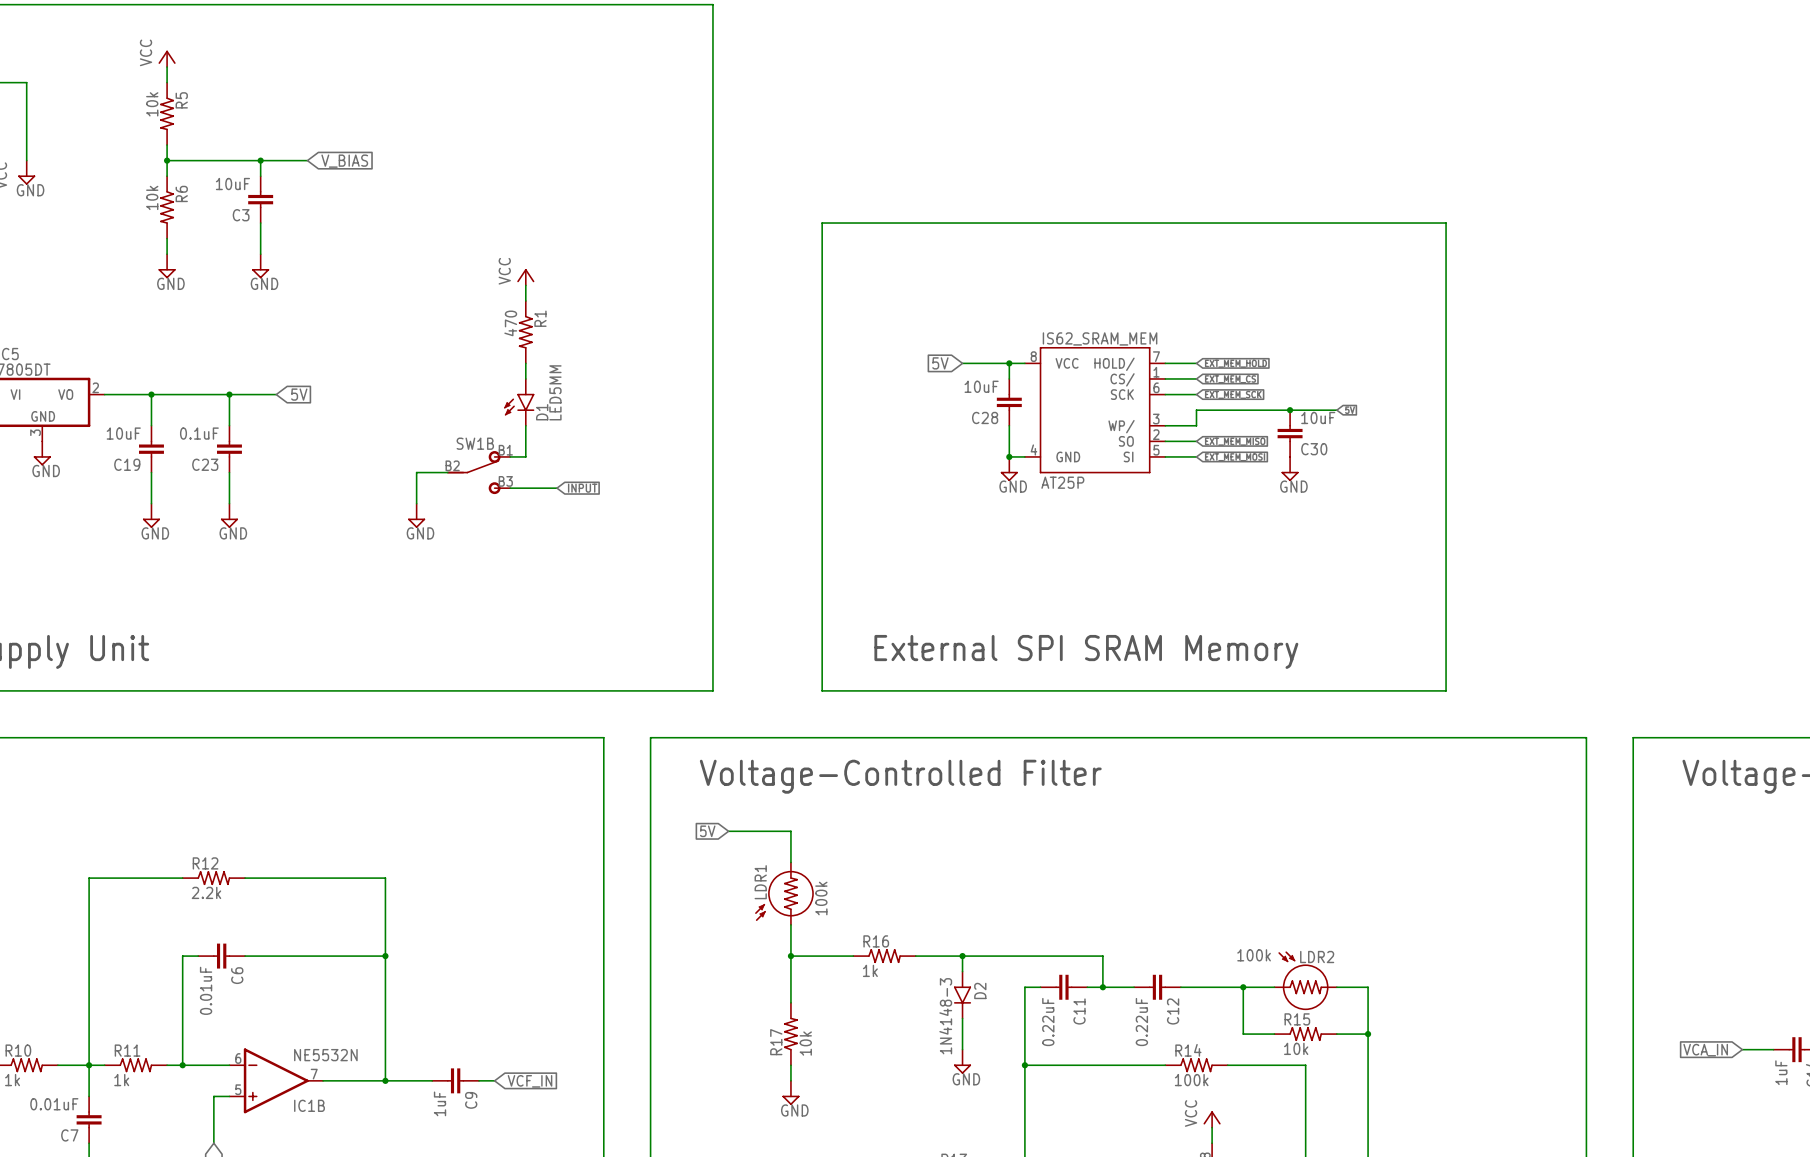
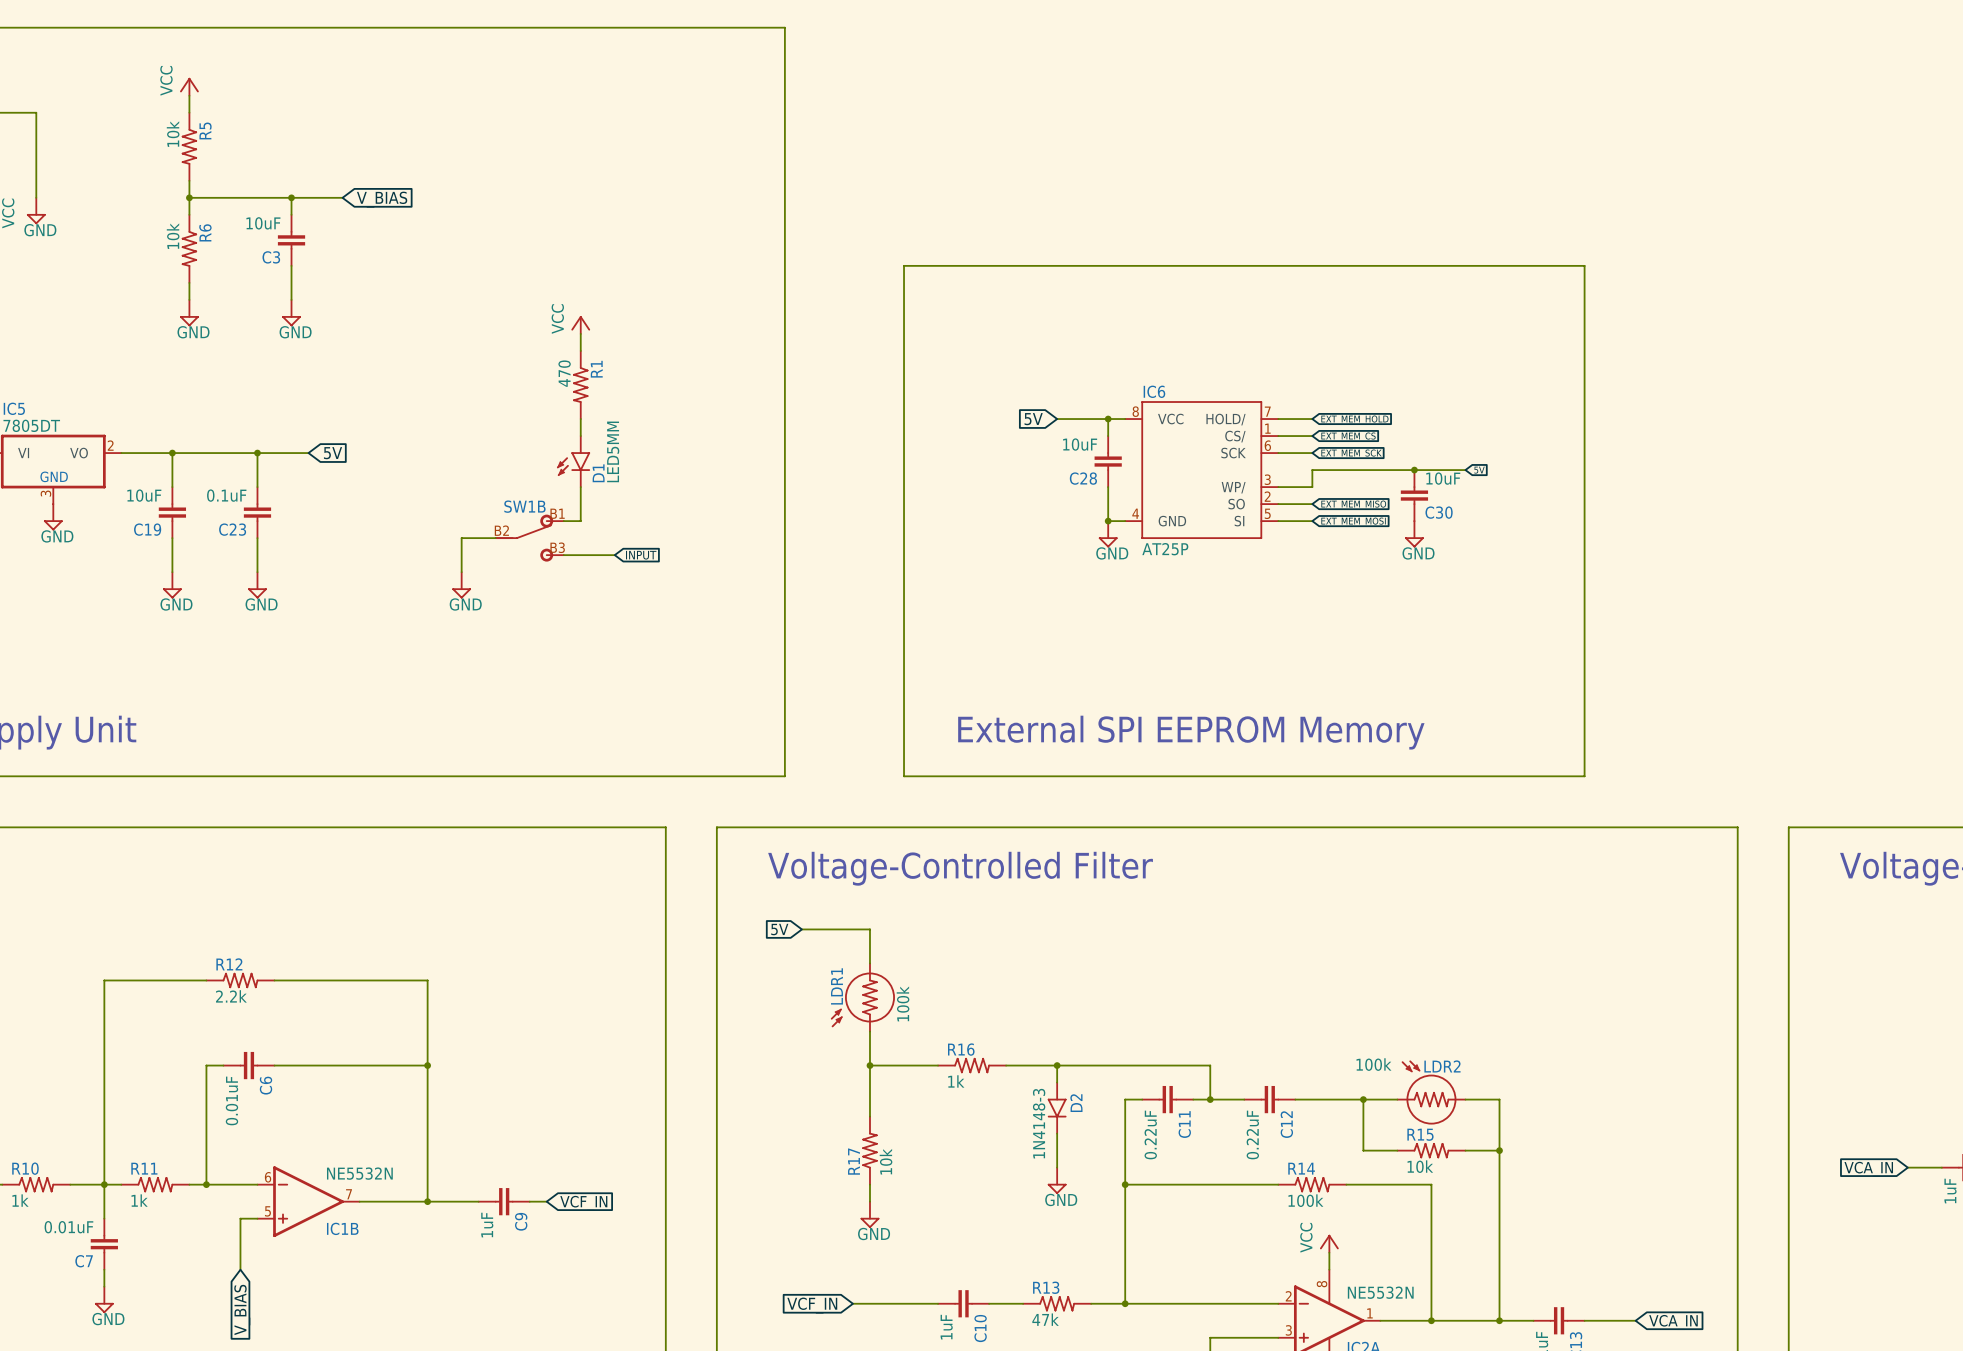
IS62_SRAM_MEM name: IS62_SRAM_MEM (1100, 338) -> IC6 (1154, 391)
text: External SPI SRAM Memory (1086, 651) -> External SPI EEPROM Memory (1191, 732)

